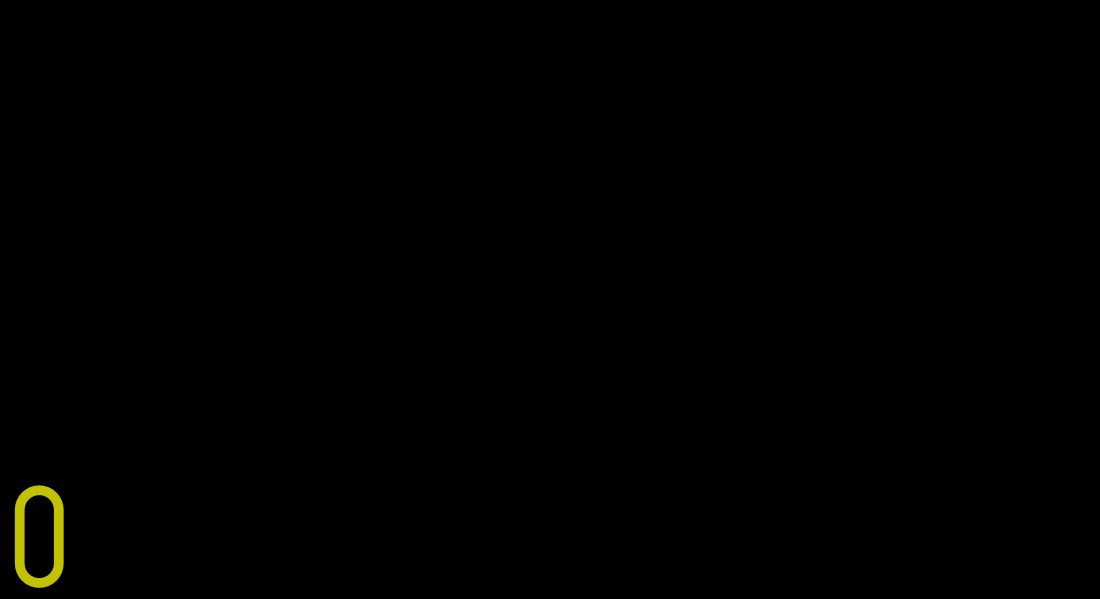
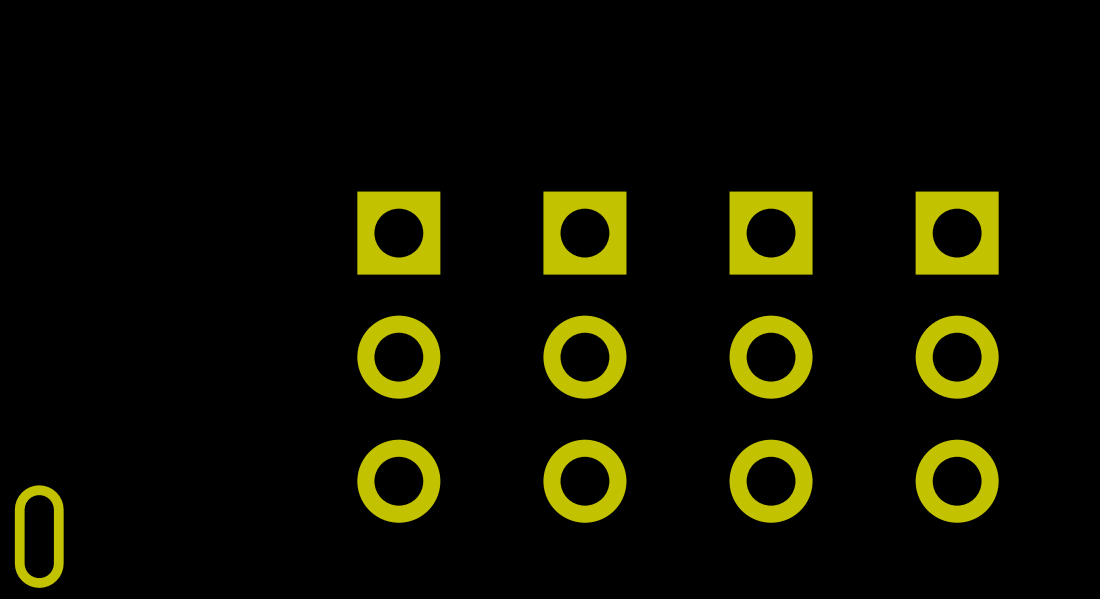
part: none -> (398, 357)
part: none -> (584, 357)
part: none -> (771, 357)
part: none -> (957, 357)

